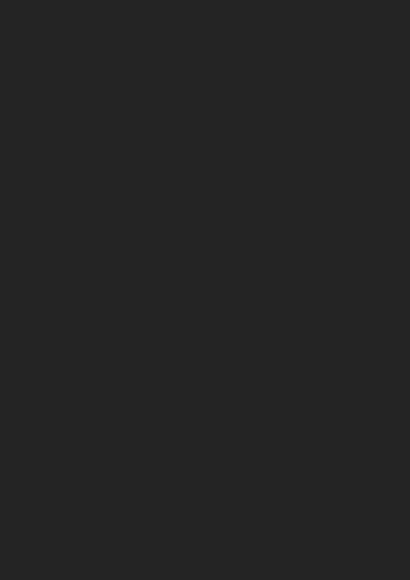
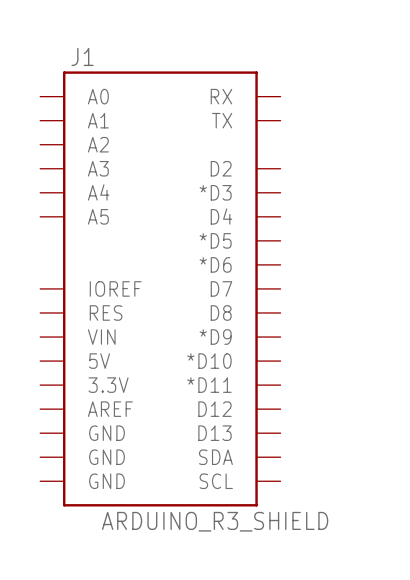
J1: none -> ARDUINO_R3_SHIELD (160, 288)

